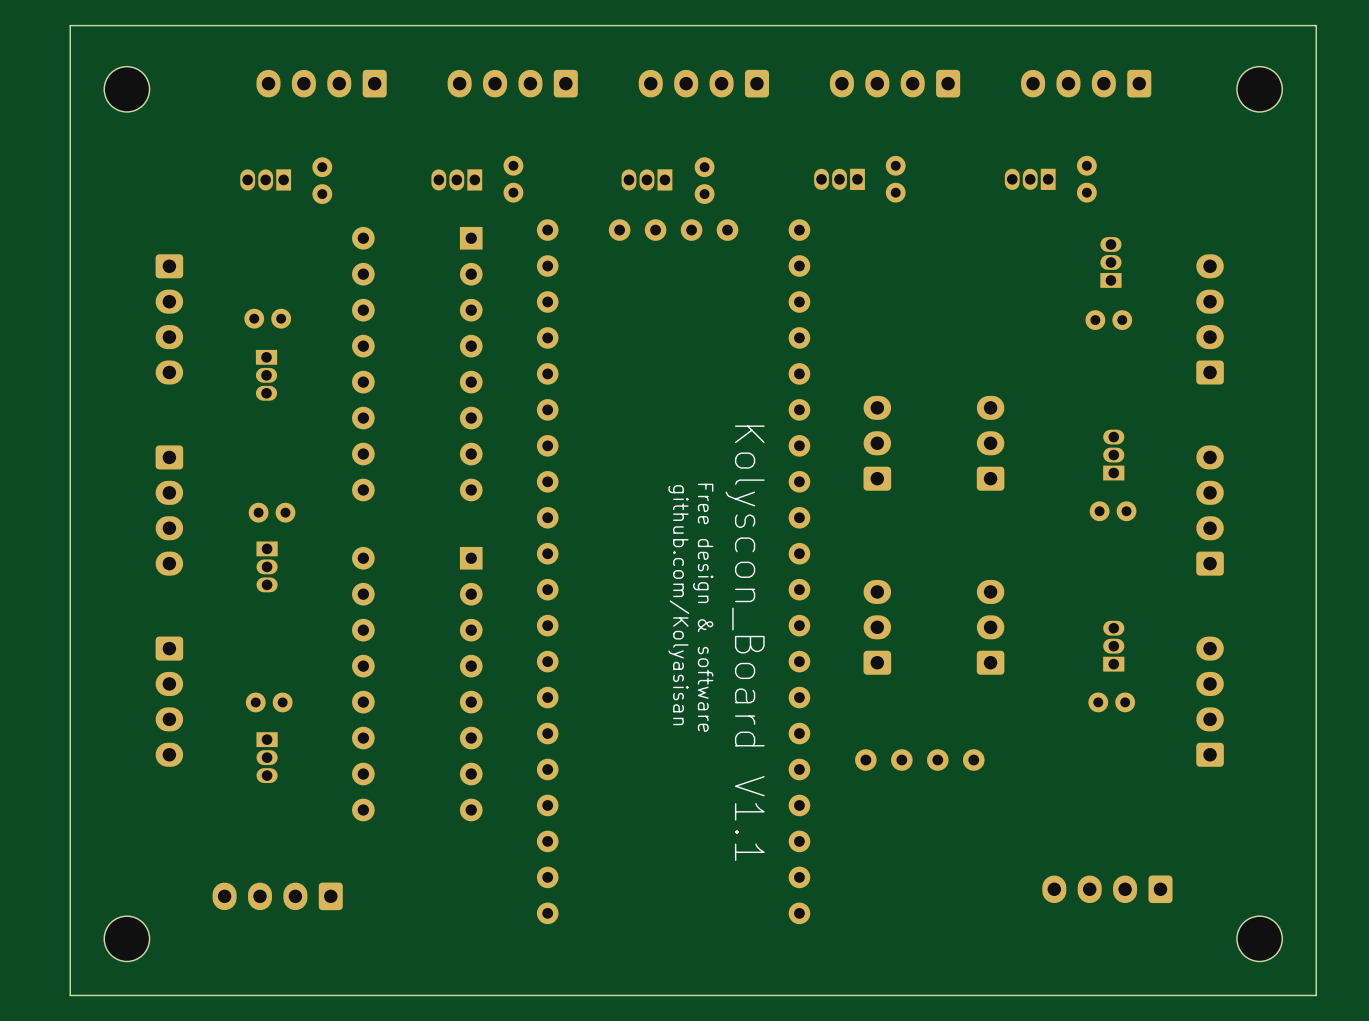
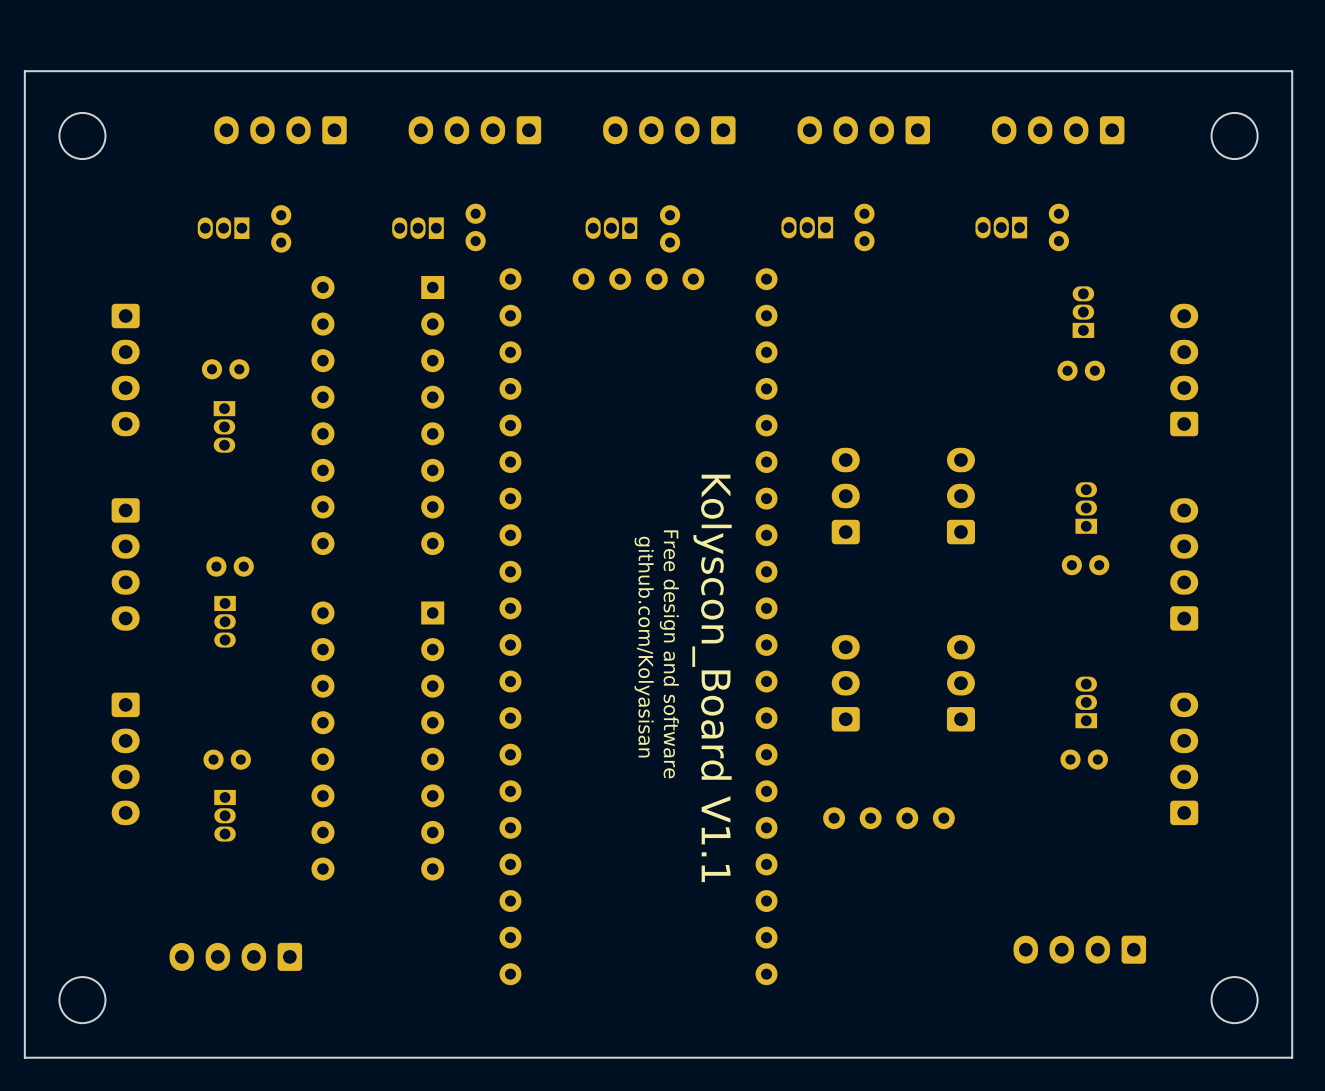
text: Free design & software (703, 607) -> Free design and software (669, 654)

